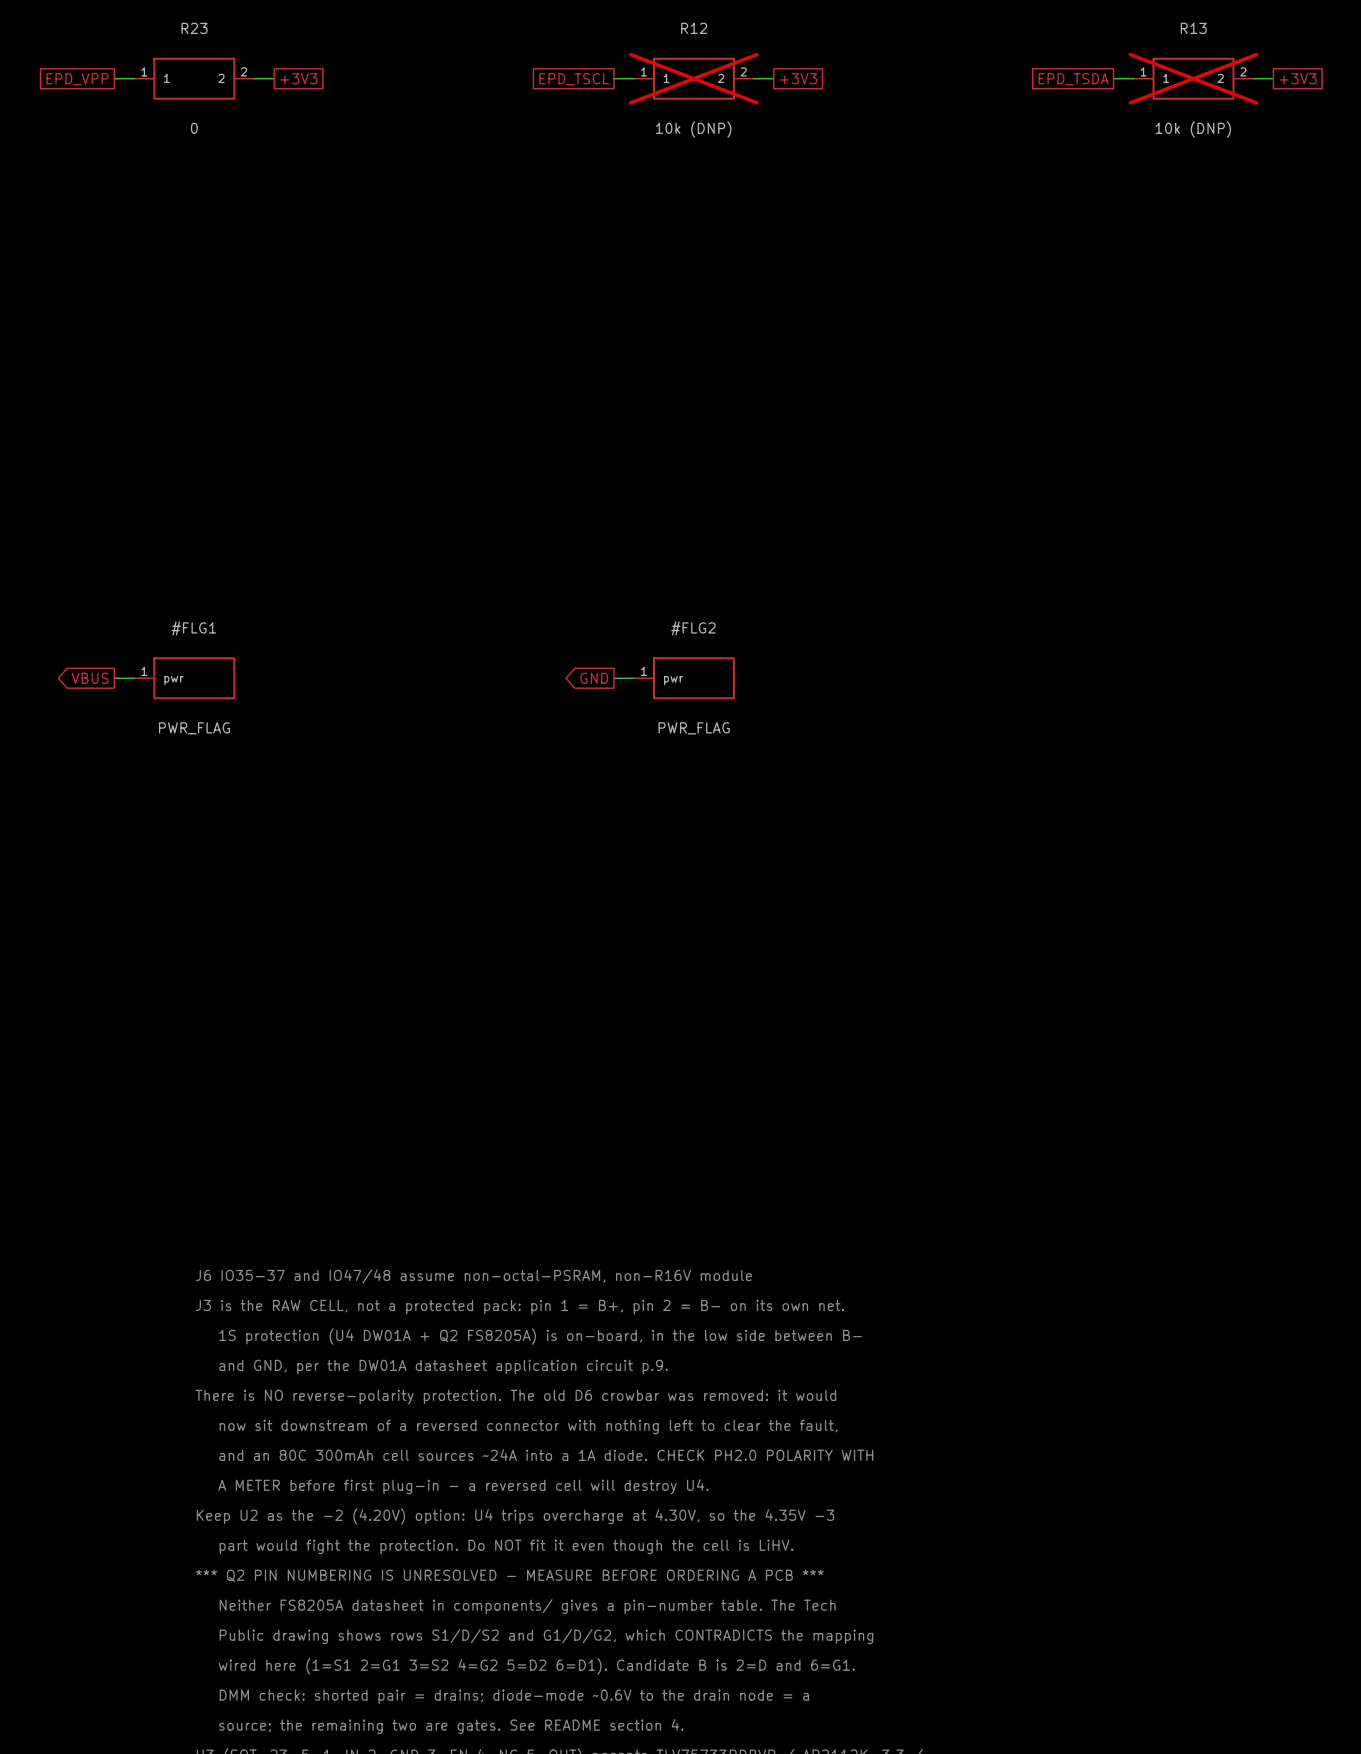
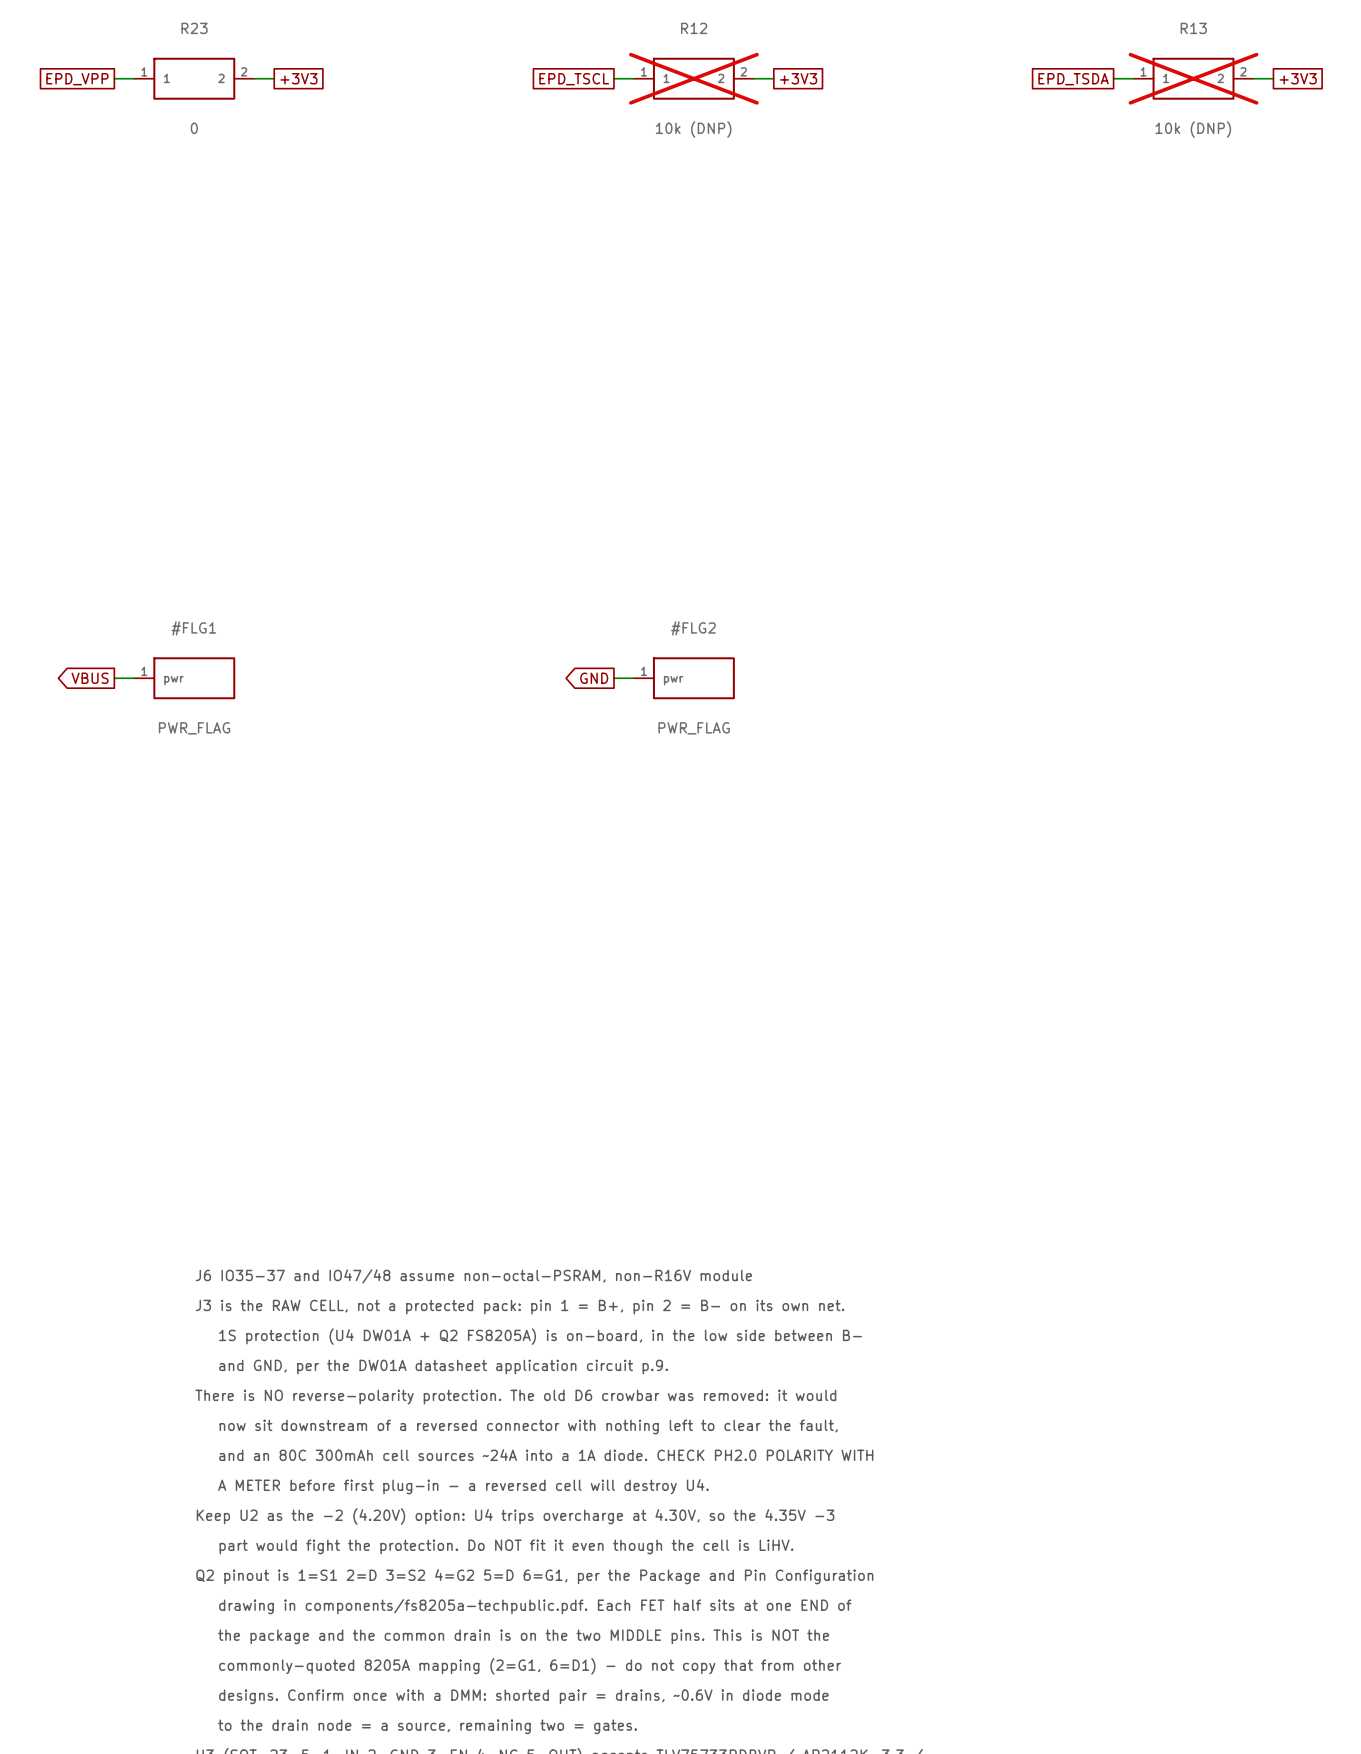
text: *** Q2 PIN NUMBERING IS UNRESOLVED - MEASURE BEFORE ORDERING A PCB *** (509, 1575) -> Q2 pinout is 1=S1 2=D 3=S2 4=G2 5=D 6=G1, per the Package and Pin Configuration (534, 1576)
text: Neither FS8205A datasheet in components/ gives a pin-number table. The Tech (527, 1606) -> drawing in components/fs8205a-techpublic.pdf. Each FET half sits at one END of (535, 1606)
text: Public drawing shows rows S1/D/S2 and G1/D/G2, which CONTRADICTS the mapping (546, 1636) -> the package and the common drain is on the two MIDDLE pins. This is NOT the (523, 1636)
text: wired here (1=S1 2=G1 3=S2 4=G2 5=D2 6=D1). Candidate B is 2=D and 6=G1. (536, 1666) -> commonly-quoted 8205A mapping (2=G1, 6=D1) - do not copy that from other (530, 1666)
text: DMM check: shorted pair = drains; diode-mode ~0.6V to the drain node = a (514, 1696) -> designs. Confirm once with a DMM: shorted pair = drains, ~0.6V in diode mode (523, 1696)
text: source; the remaining two are gates. See README section 4. (451, 1726) -> to the drain node = a source, remaining two = gates. (427, 1726)

